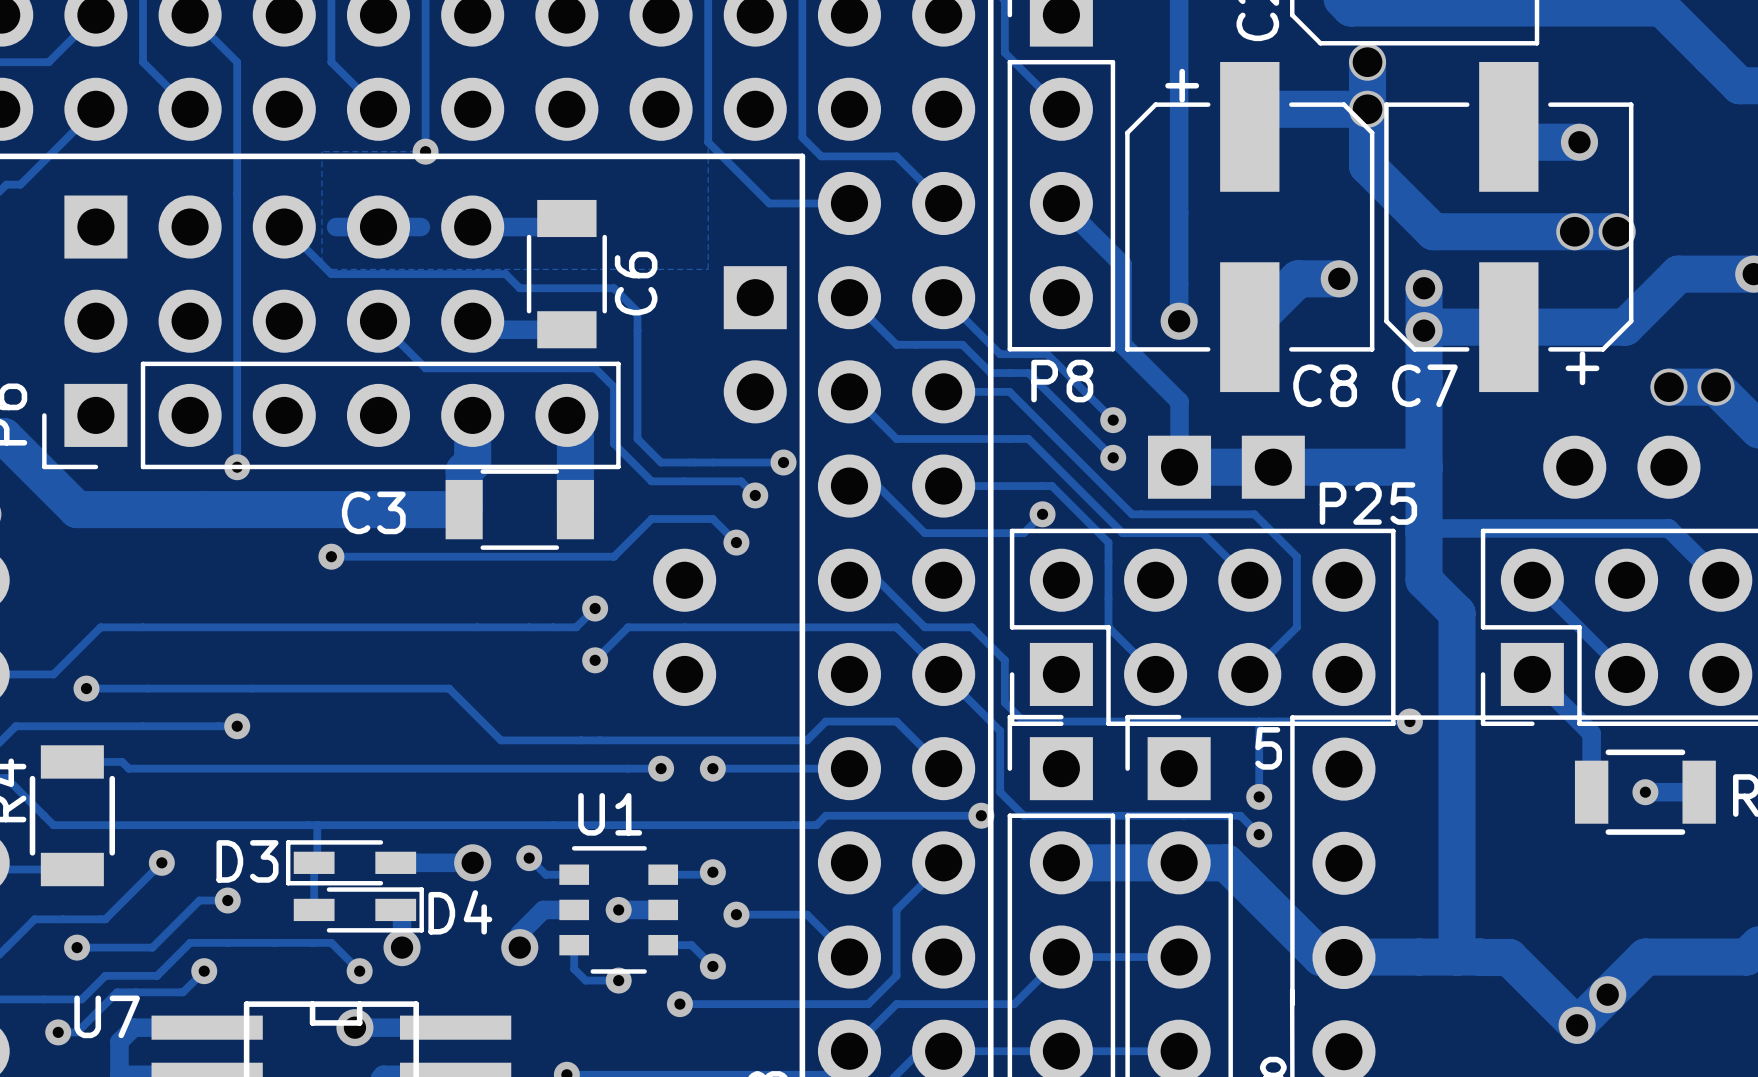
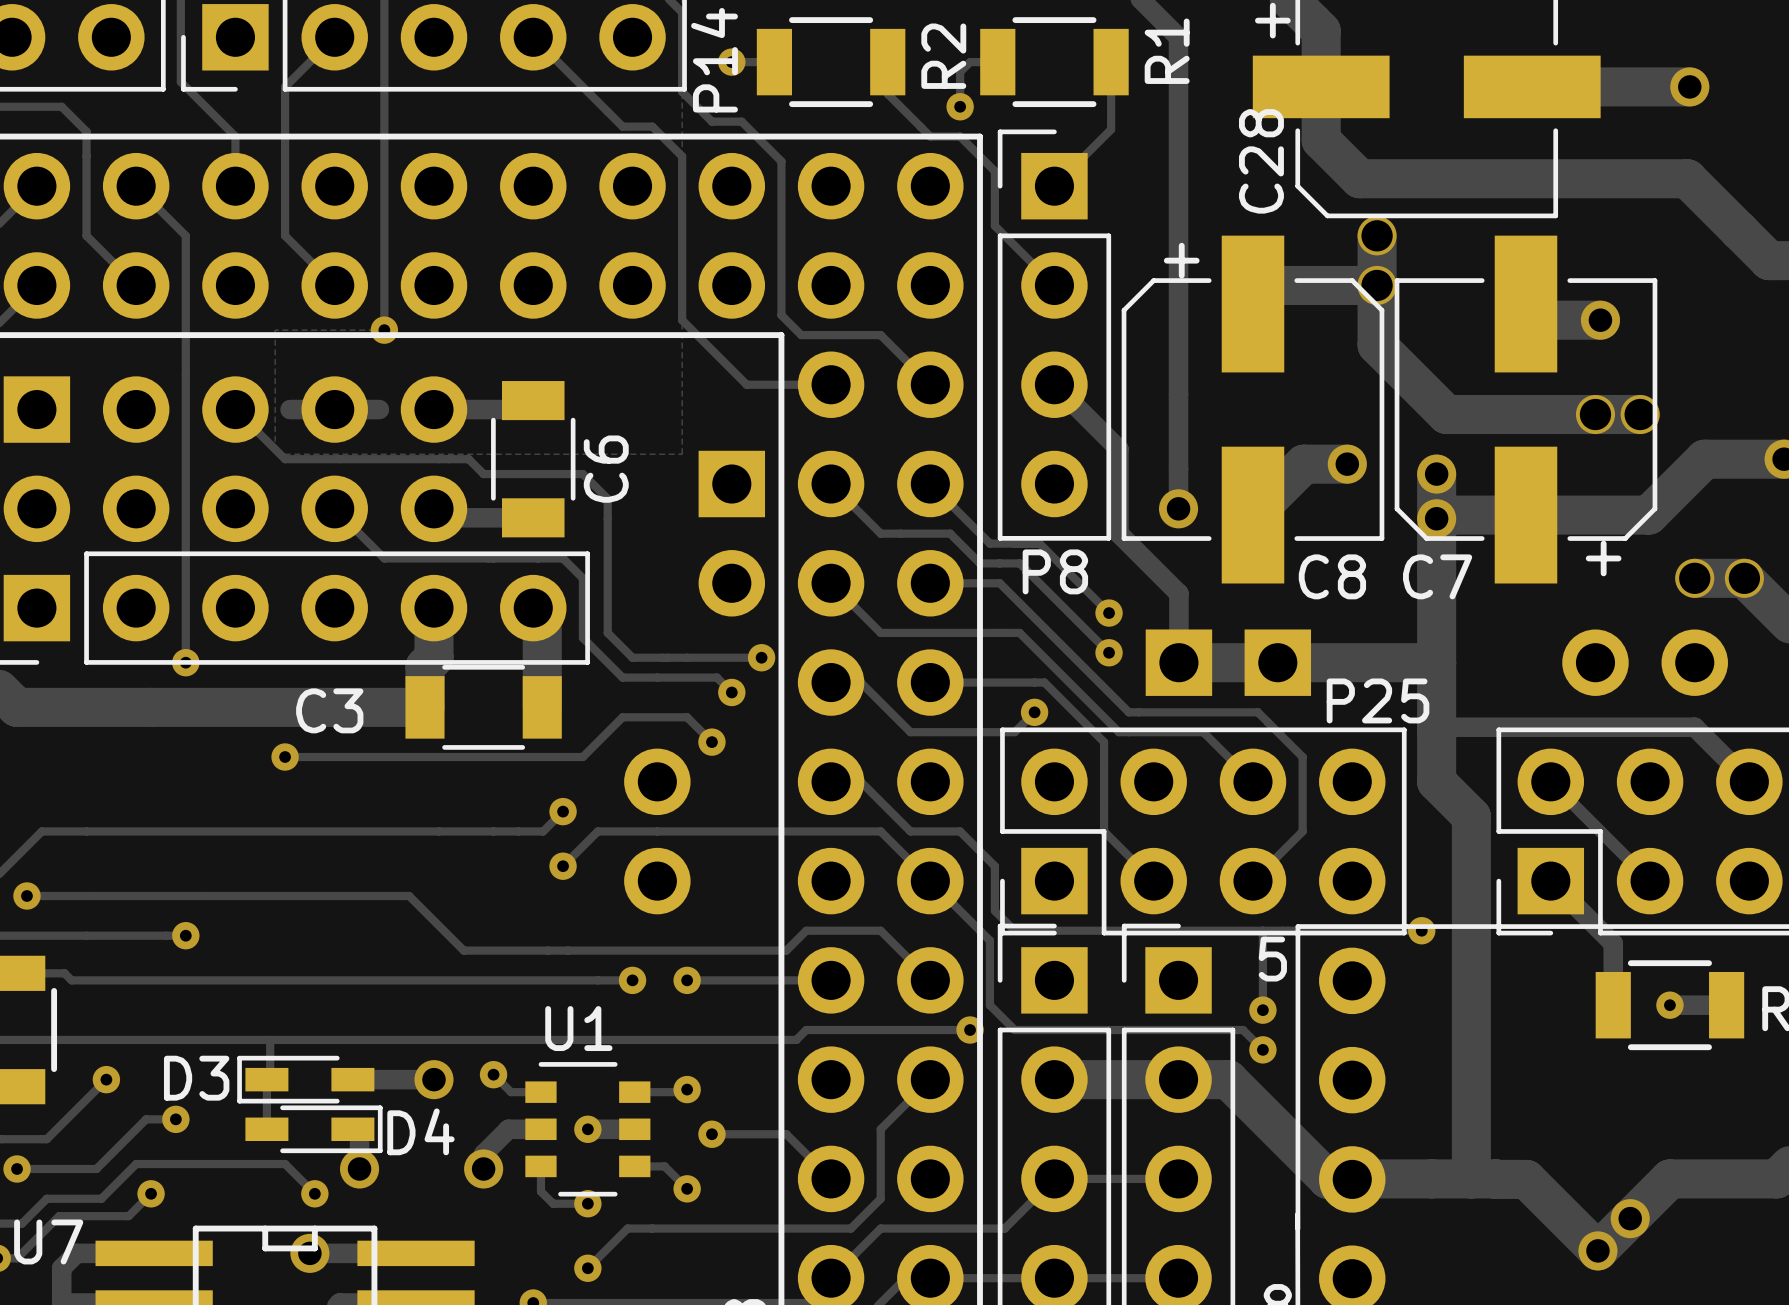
track: none -> (652, 1228) (627, 1228) (587, 1268)
via: (679, 1004) -> none
via: none -> (587, 1268)

